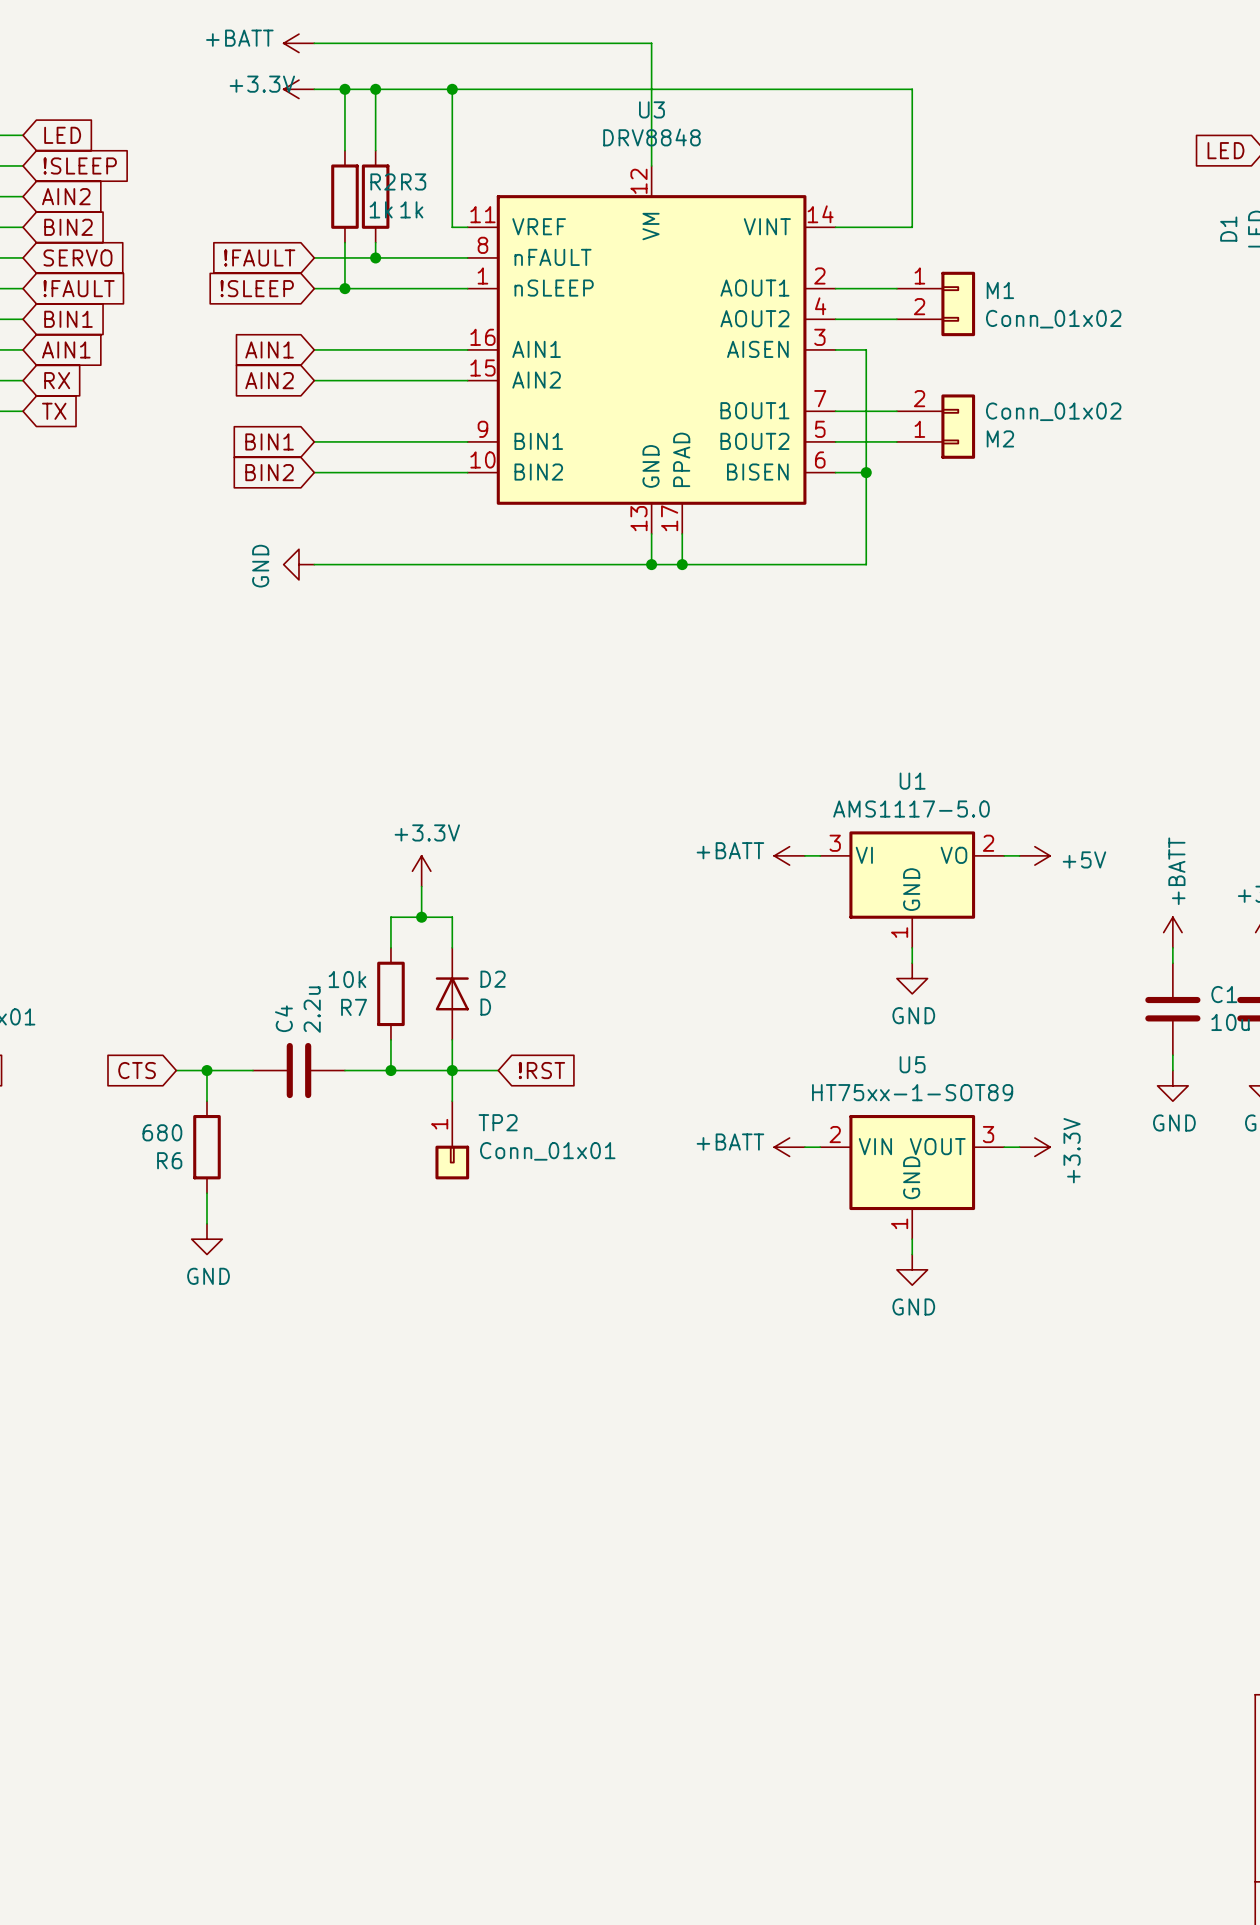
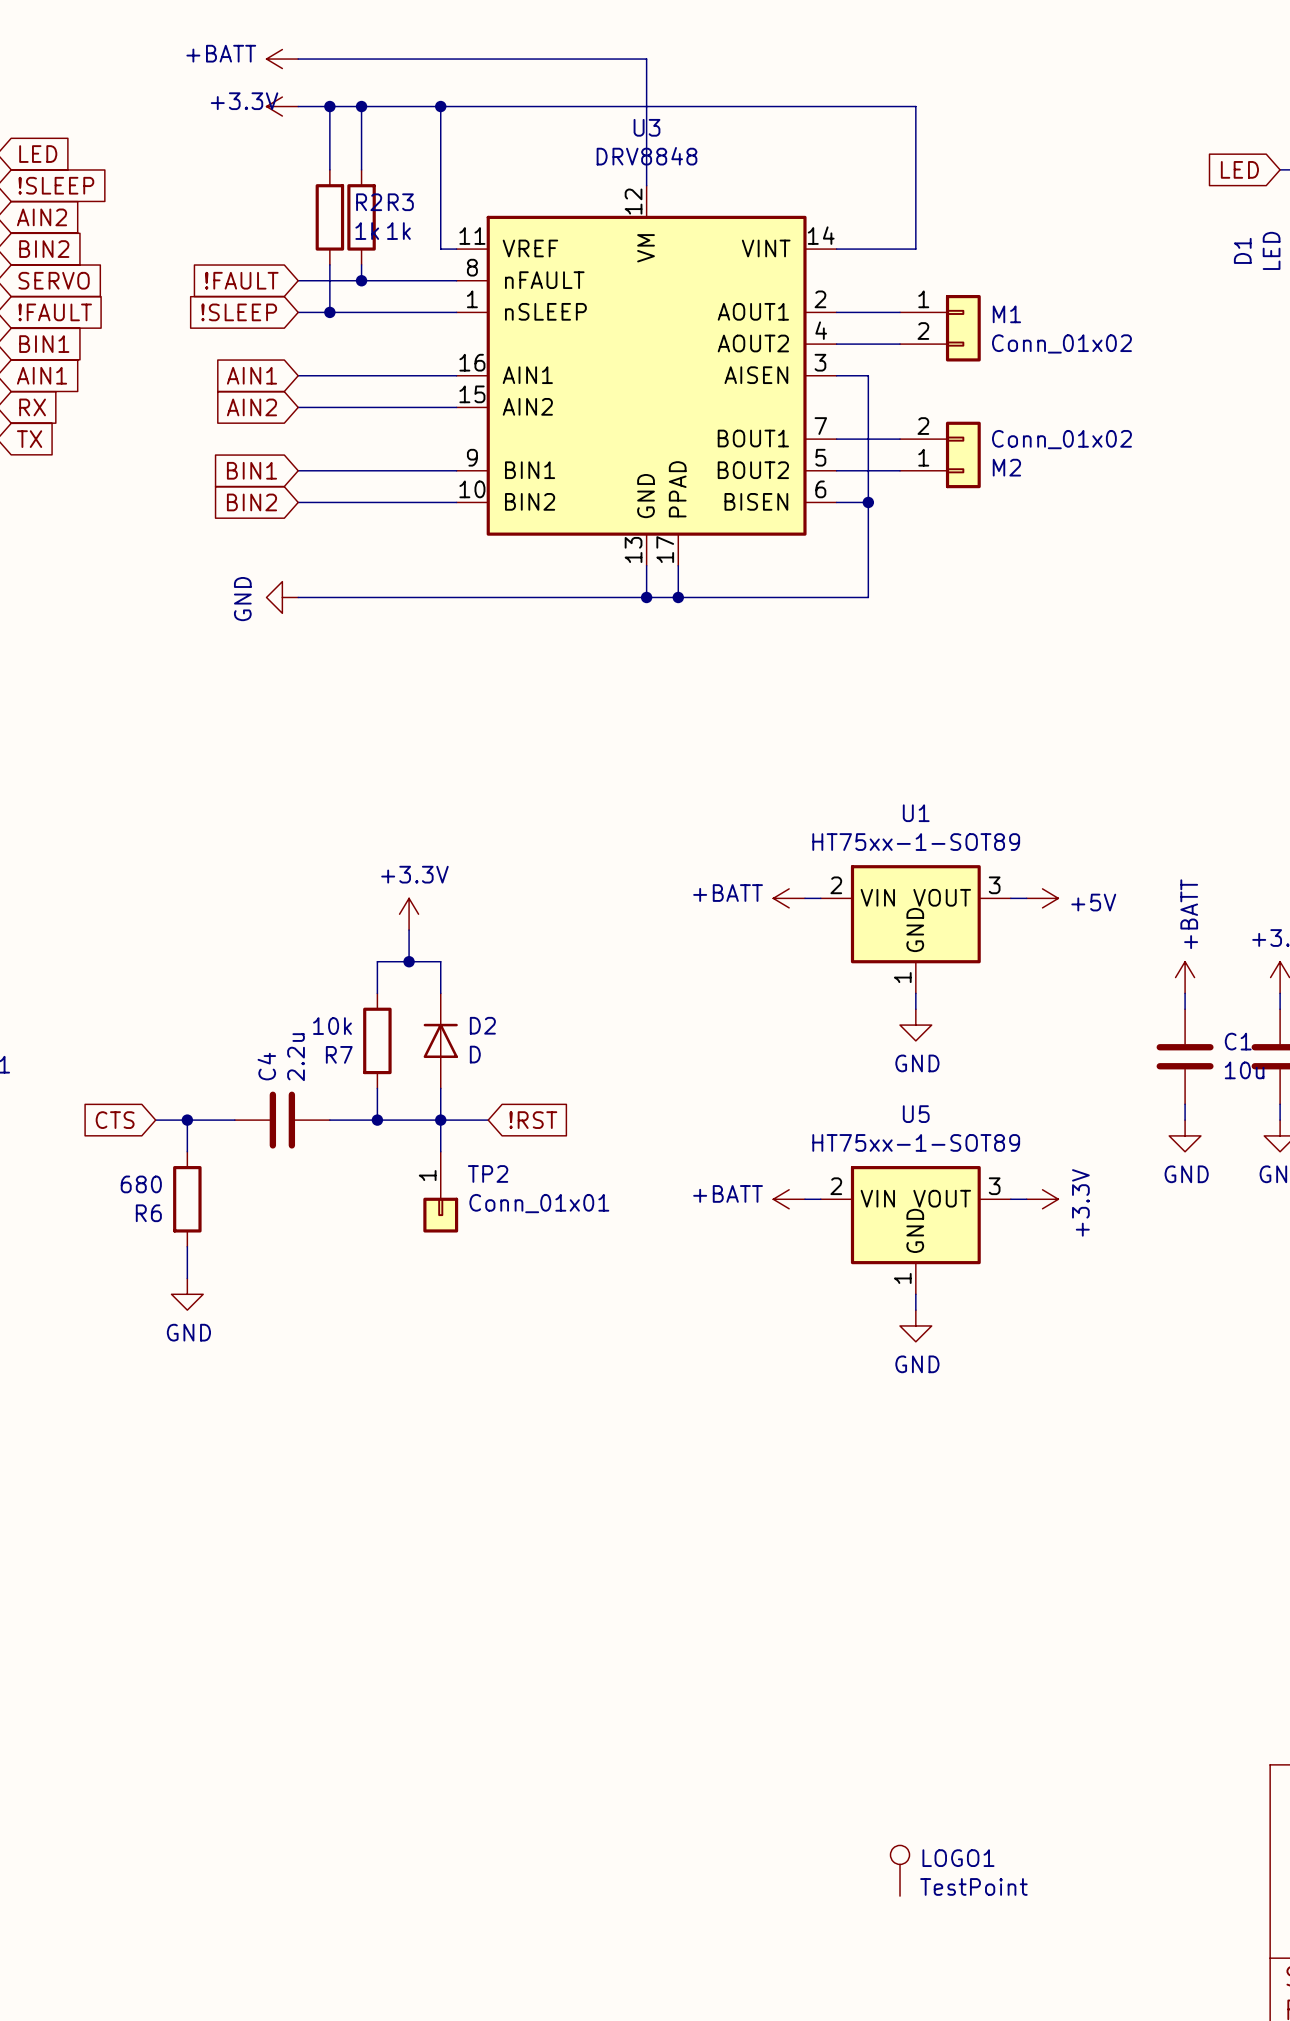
U1 value: AMS1117-5.0 (911, 809) -> HT75xx-1-SOT89 (916, 842)
U1 symbol: [820, 831, 1005, 948] -> [820, 865, 1011, 994]
LOGO1: none -> TestPoint (900, 1870)

